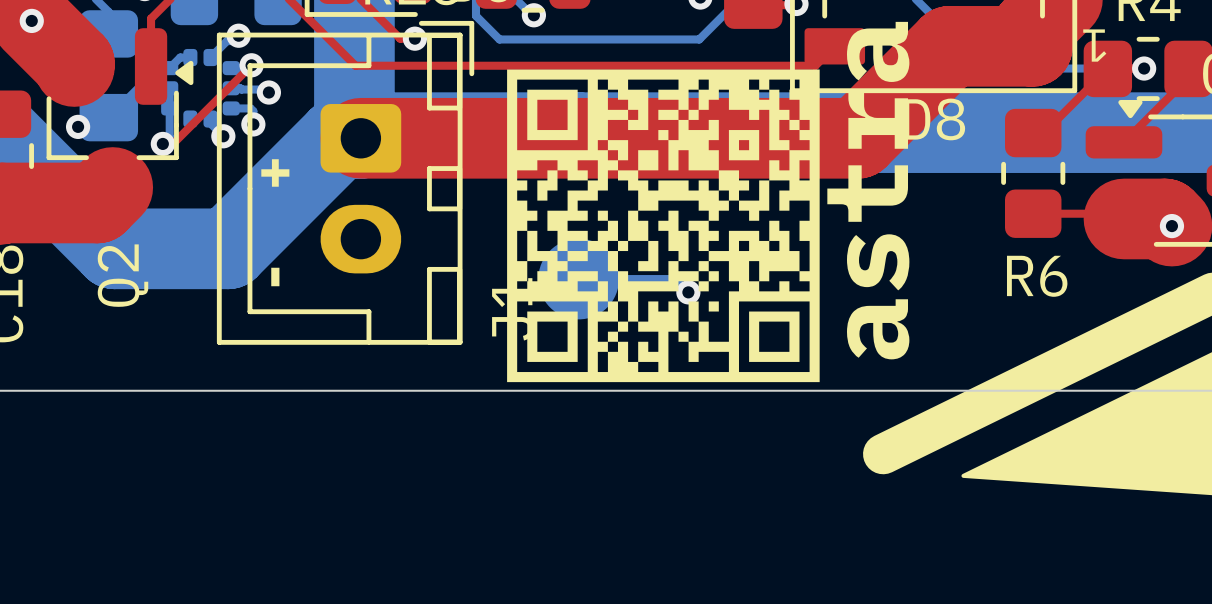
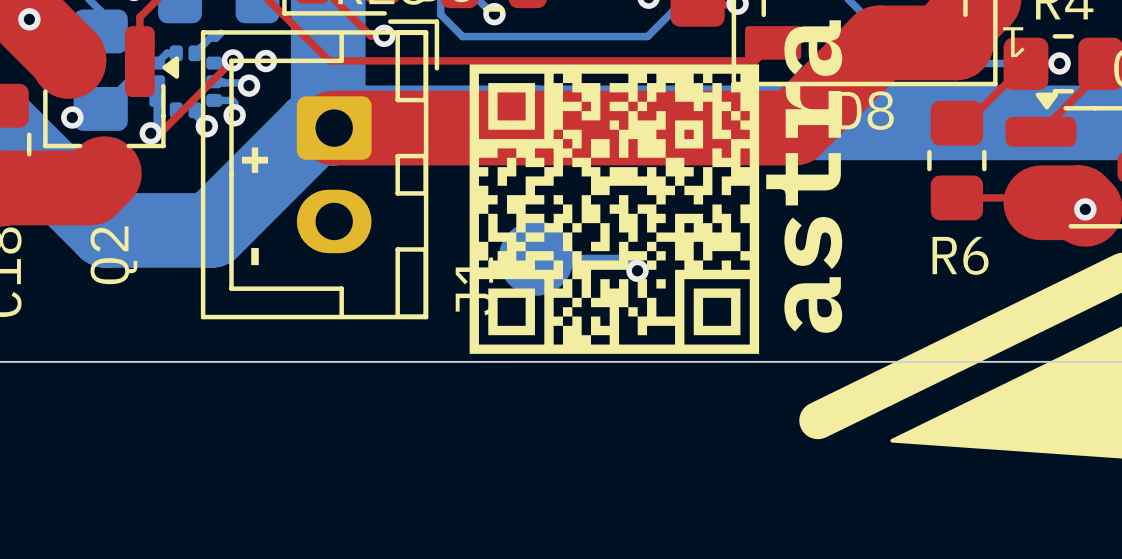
via position: (238, 35) -> (265, 61)

